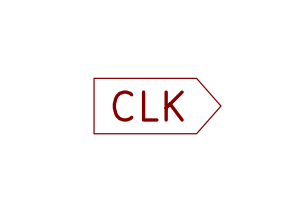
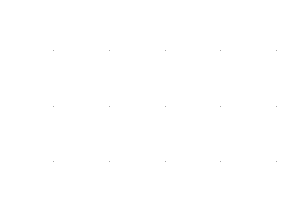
global label: CLK (148, 106) -> none

